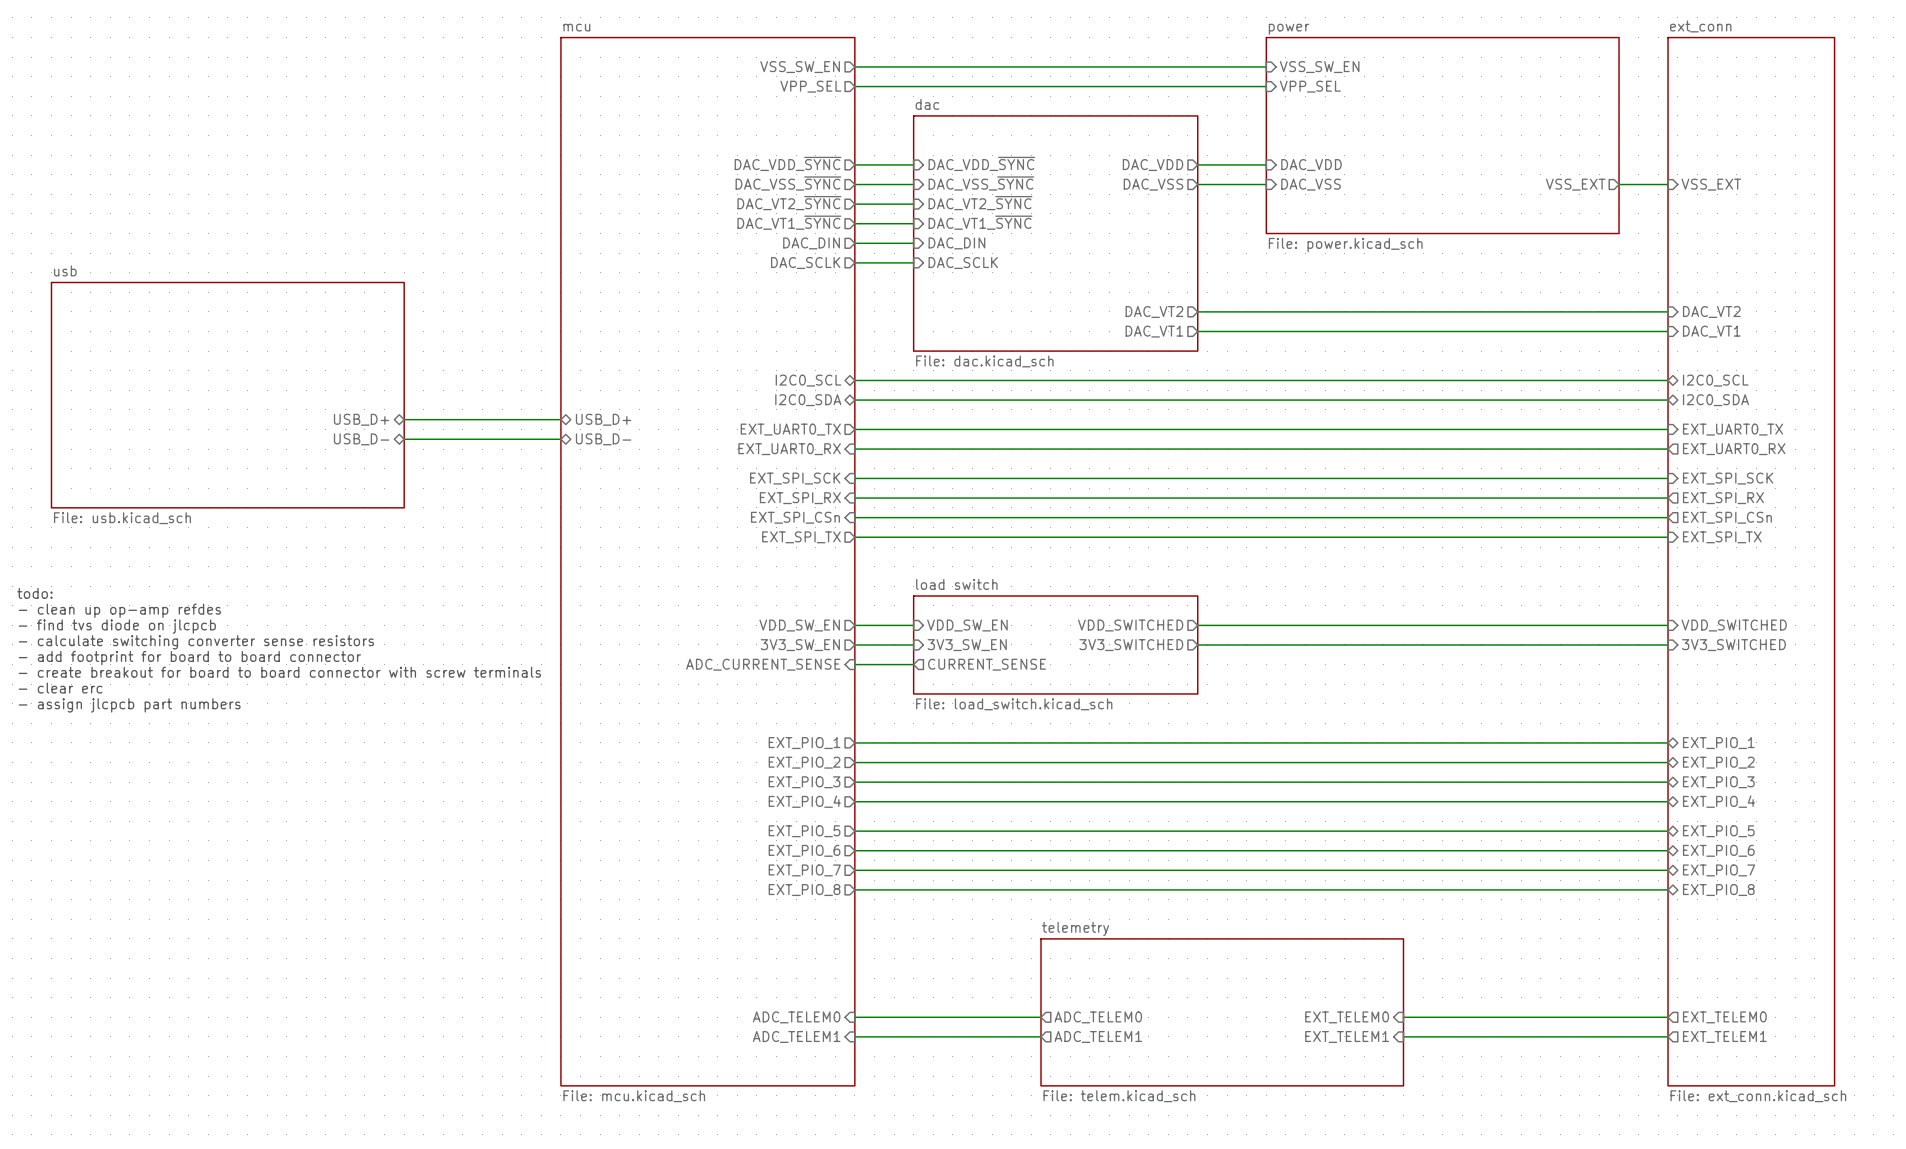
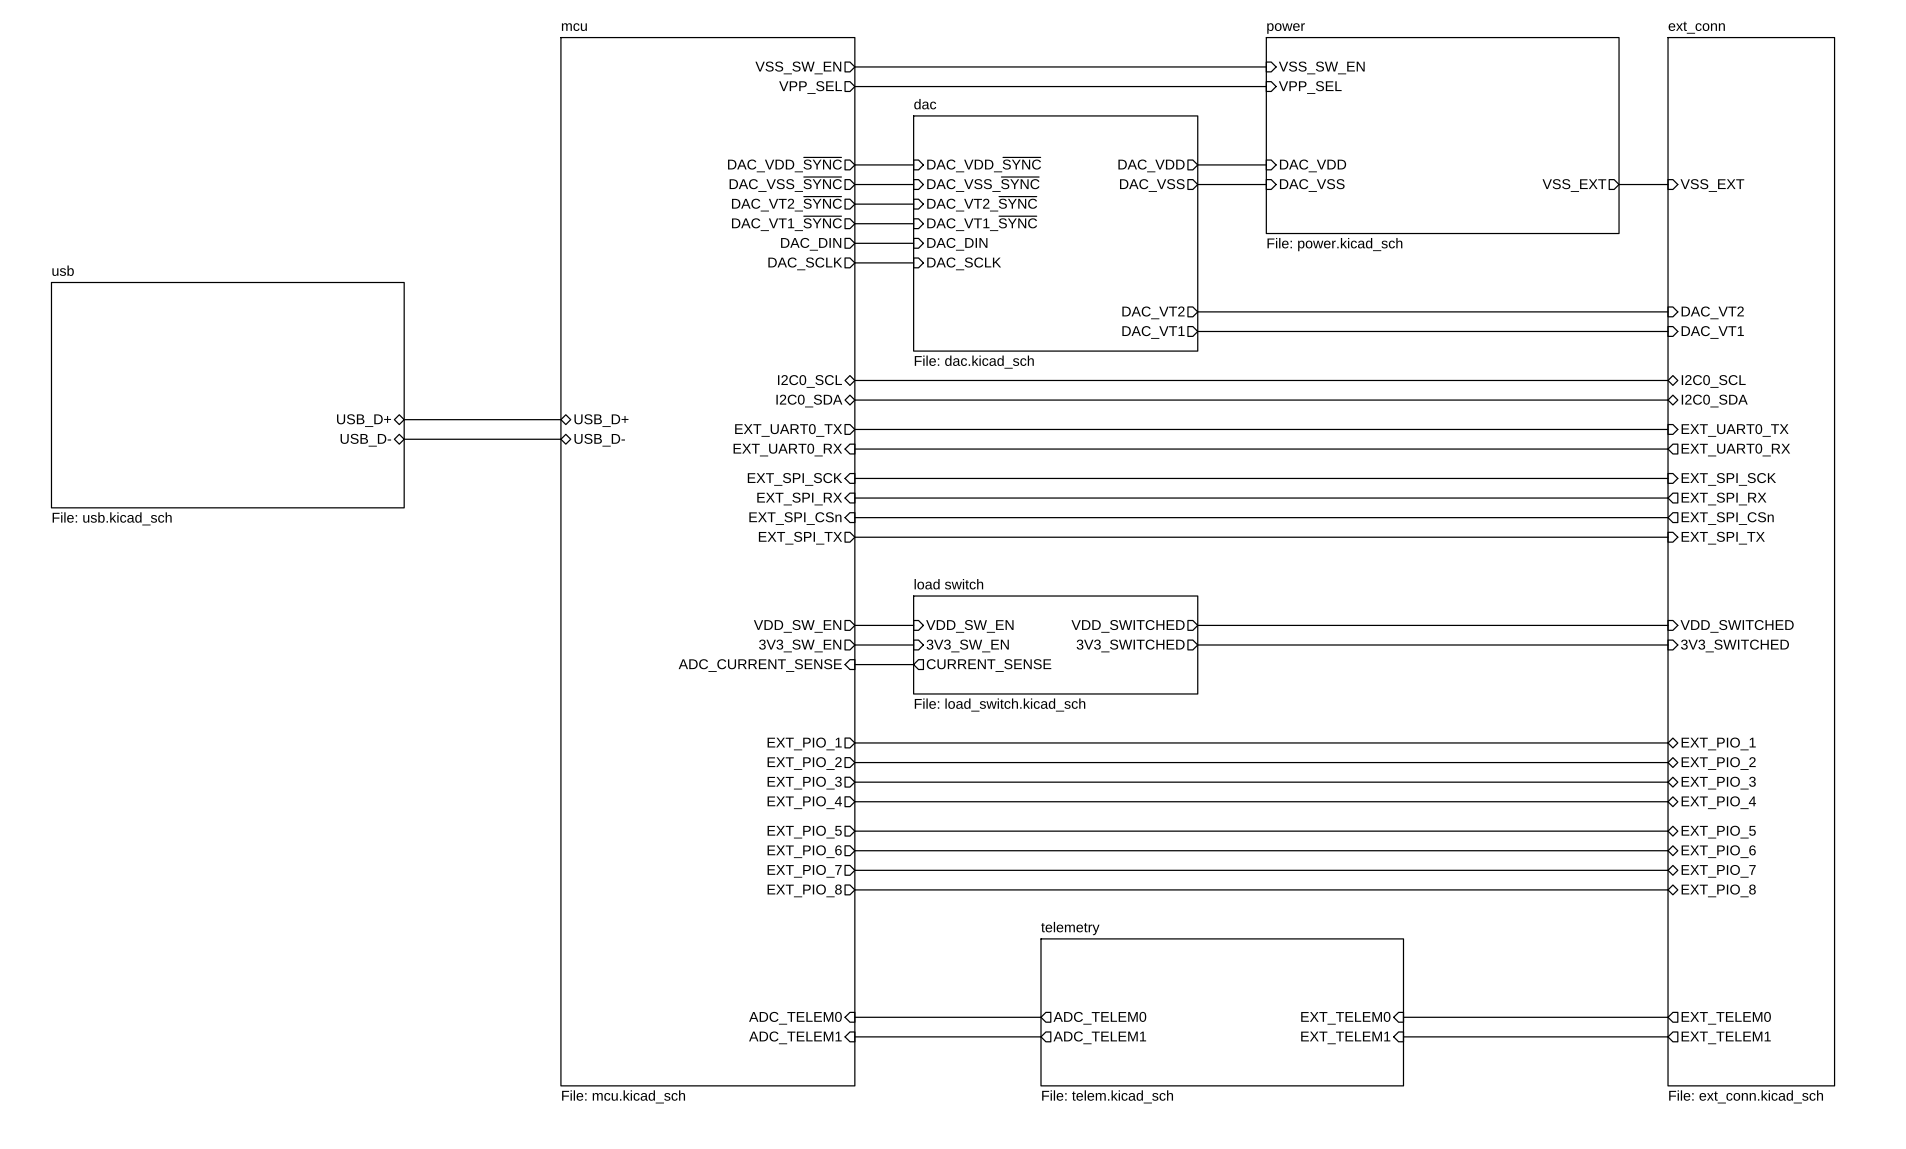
text: todo: (34, 593) -> none
text: - clean up op-amp refdes (119, 610) -> none
text: - find tvs diode on jlcpcb (117, 626) -> none
text: - calculate switching converter sense resistors (196, 642) -> none
text: - add footprint for board to board connector (189, 658) -> none
text: - create breakout for board to board connector with screw terminals (279, 672) -> none
text: - clear erc (60, 688) -> none
text: - assign jlcpcb part numbers (129, 705) -> none

